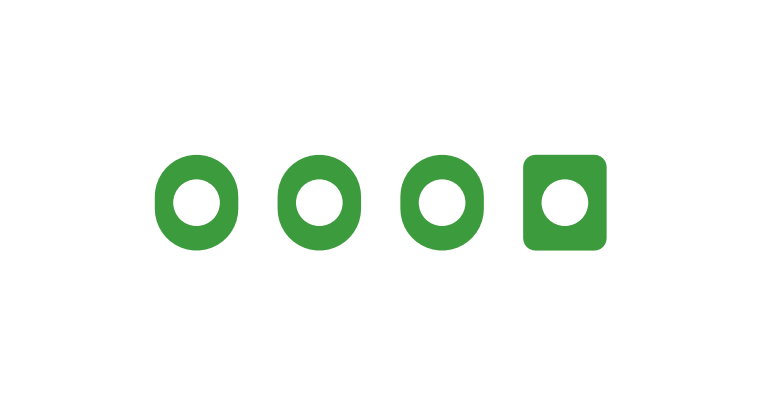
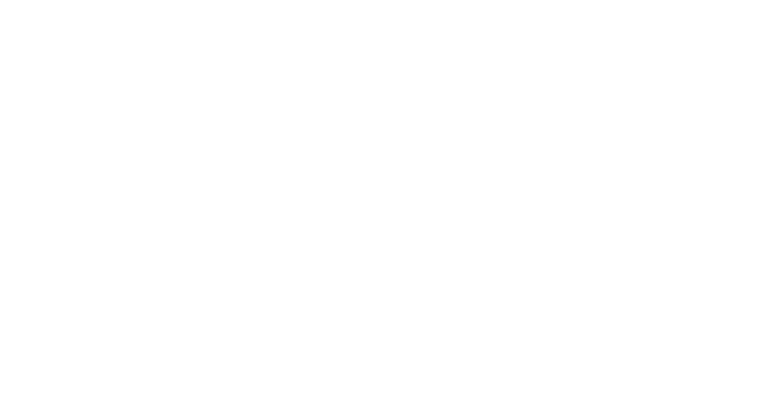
part: (380, 202) -> none

